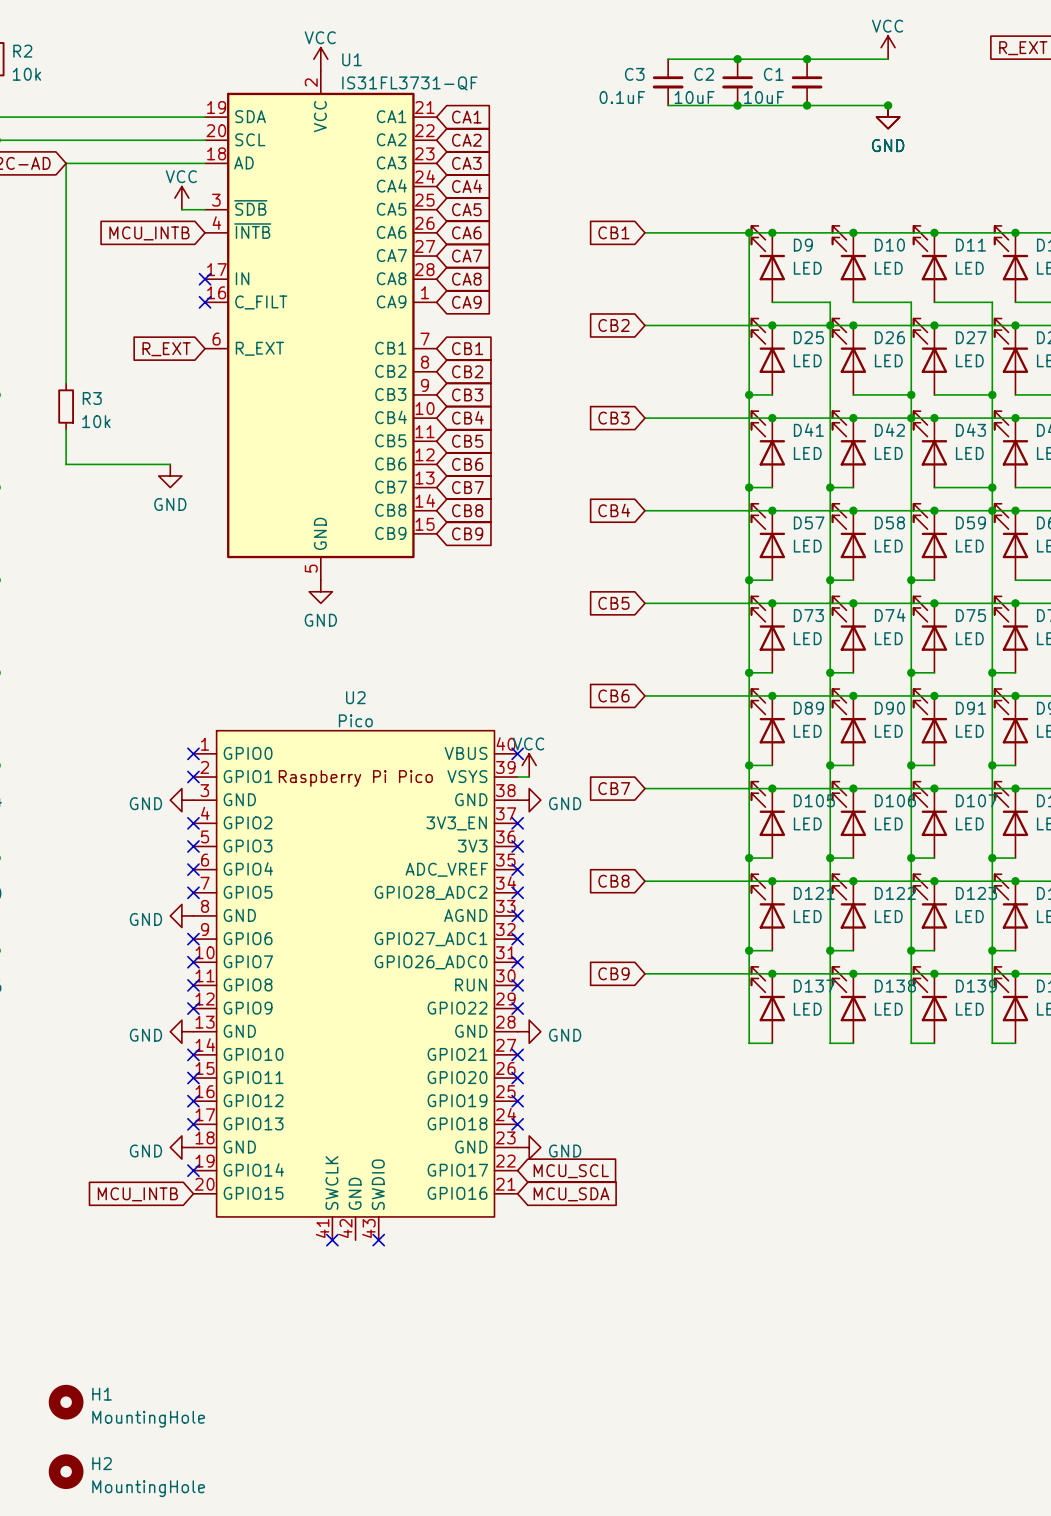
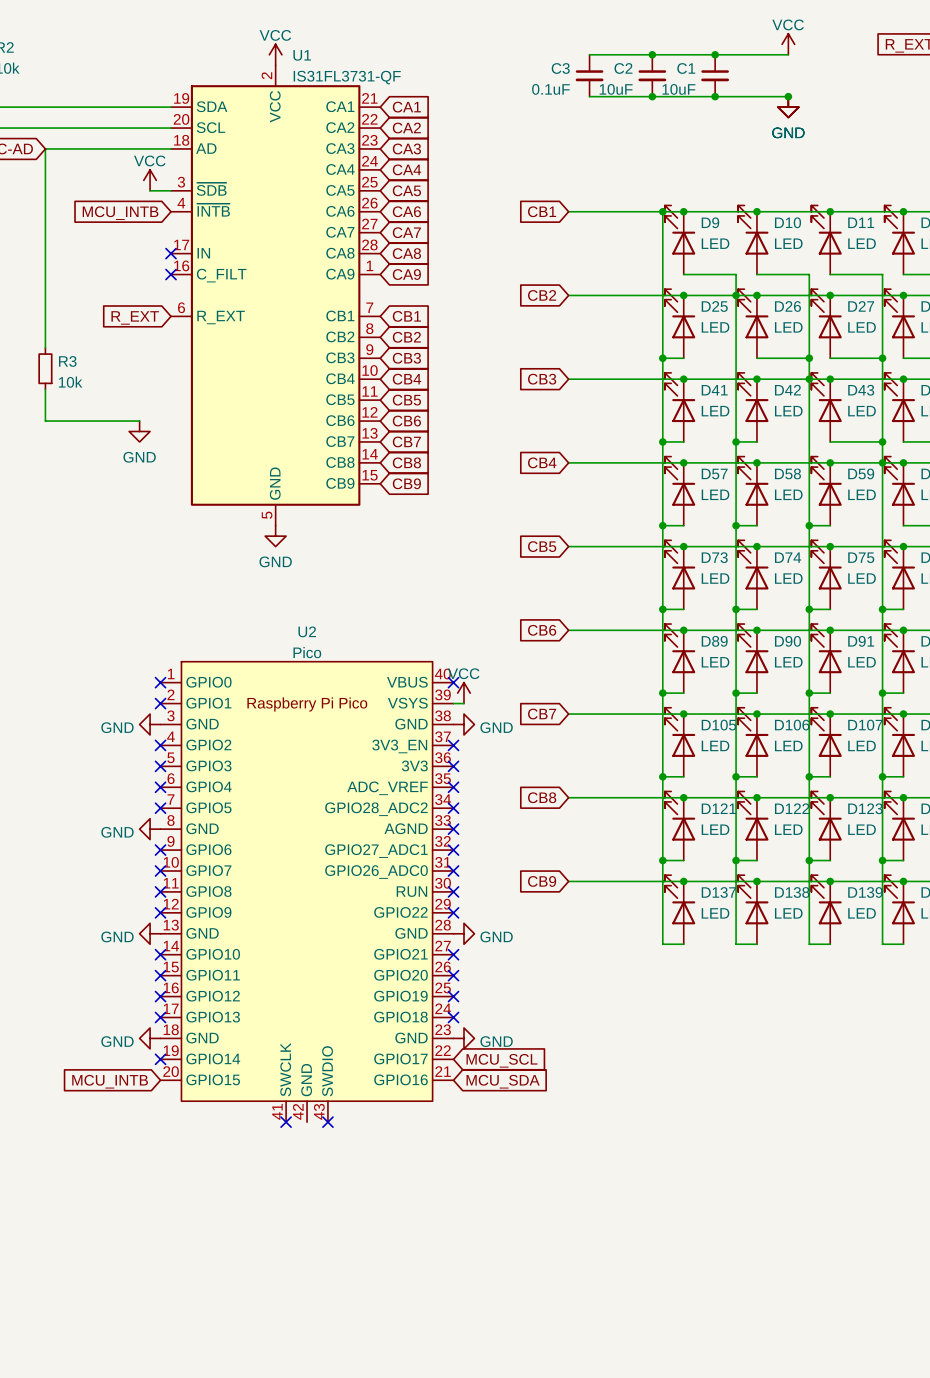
H1: MountingHole (66, 1402) -> none
H2: MountingHole (66, 1471) -> none

